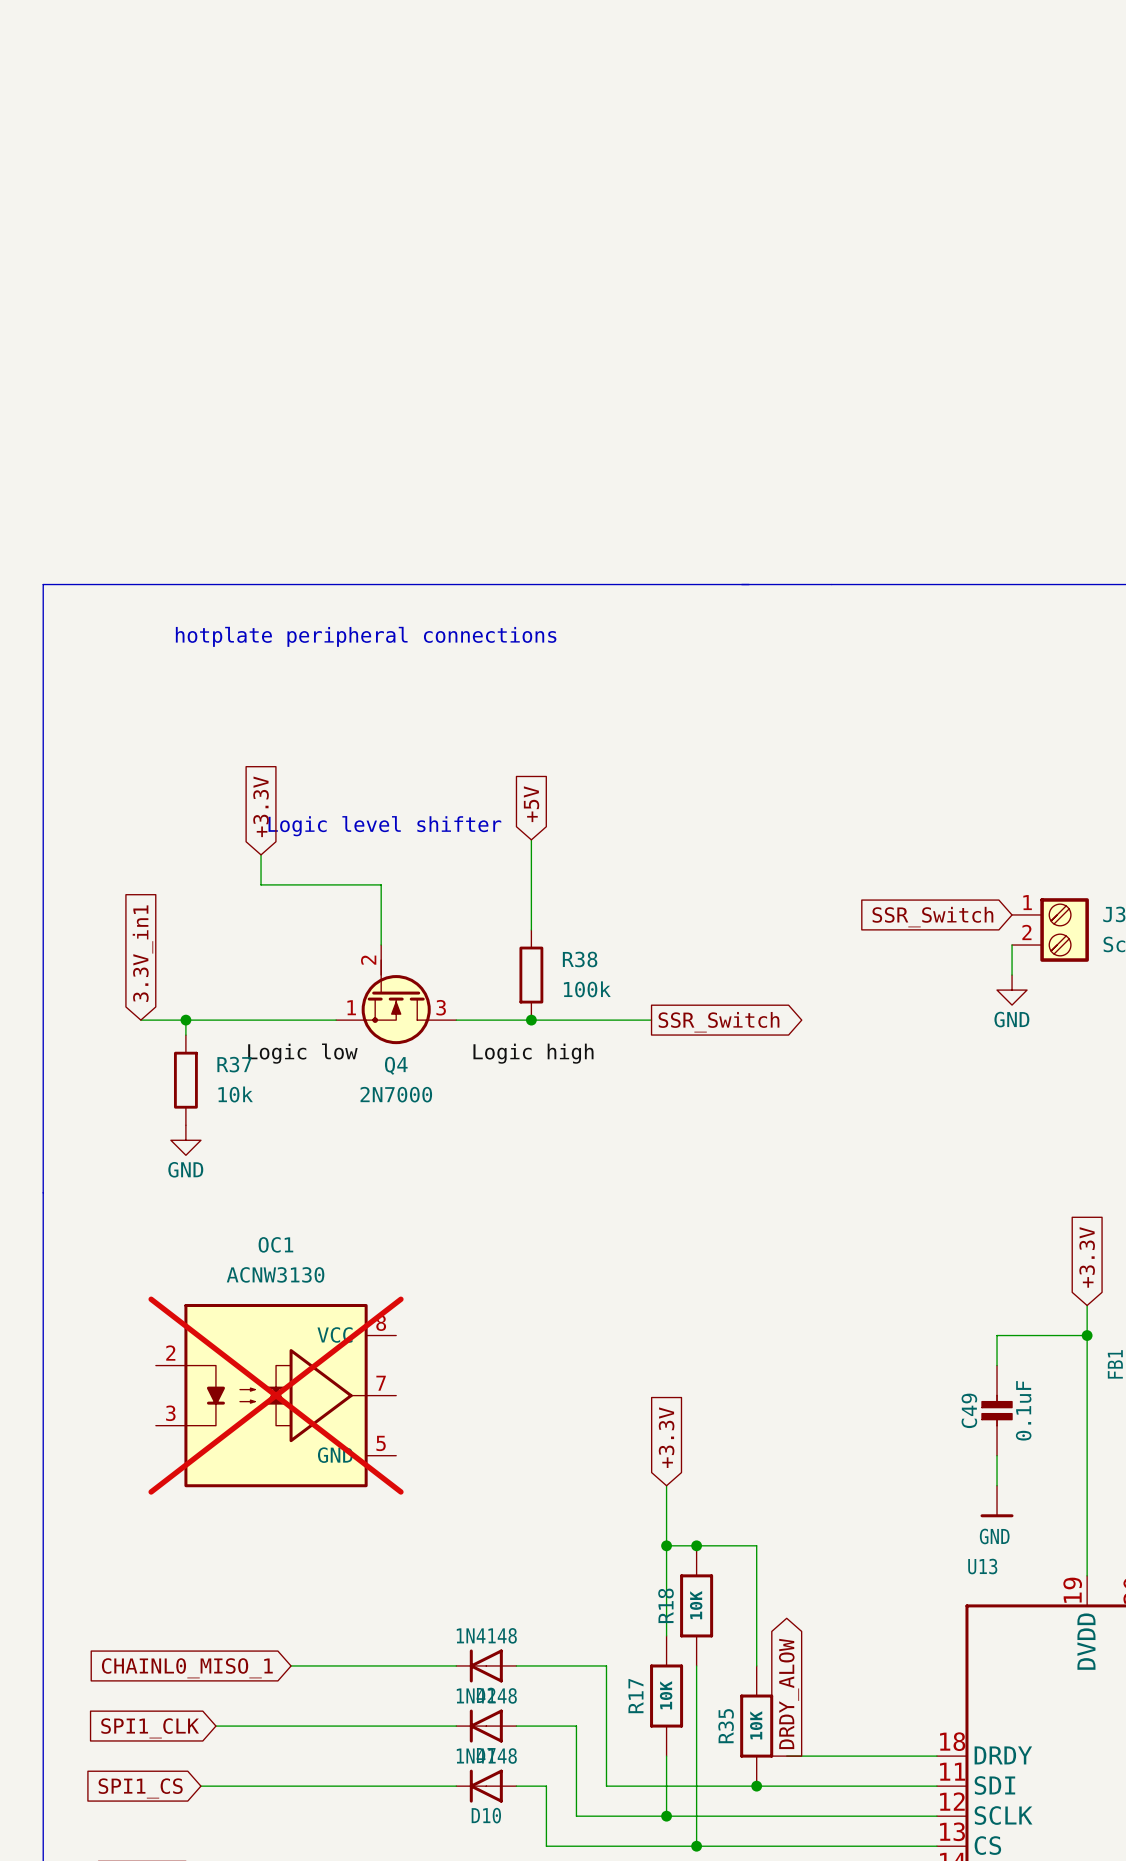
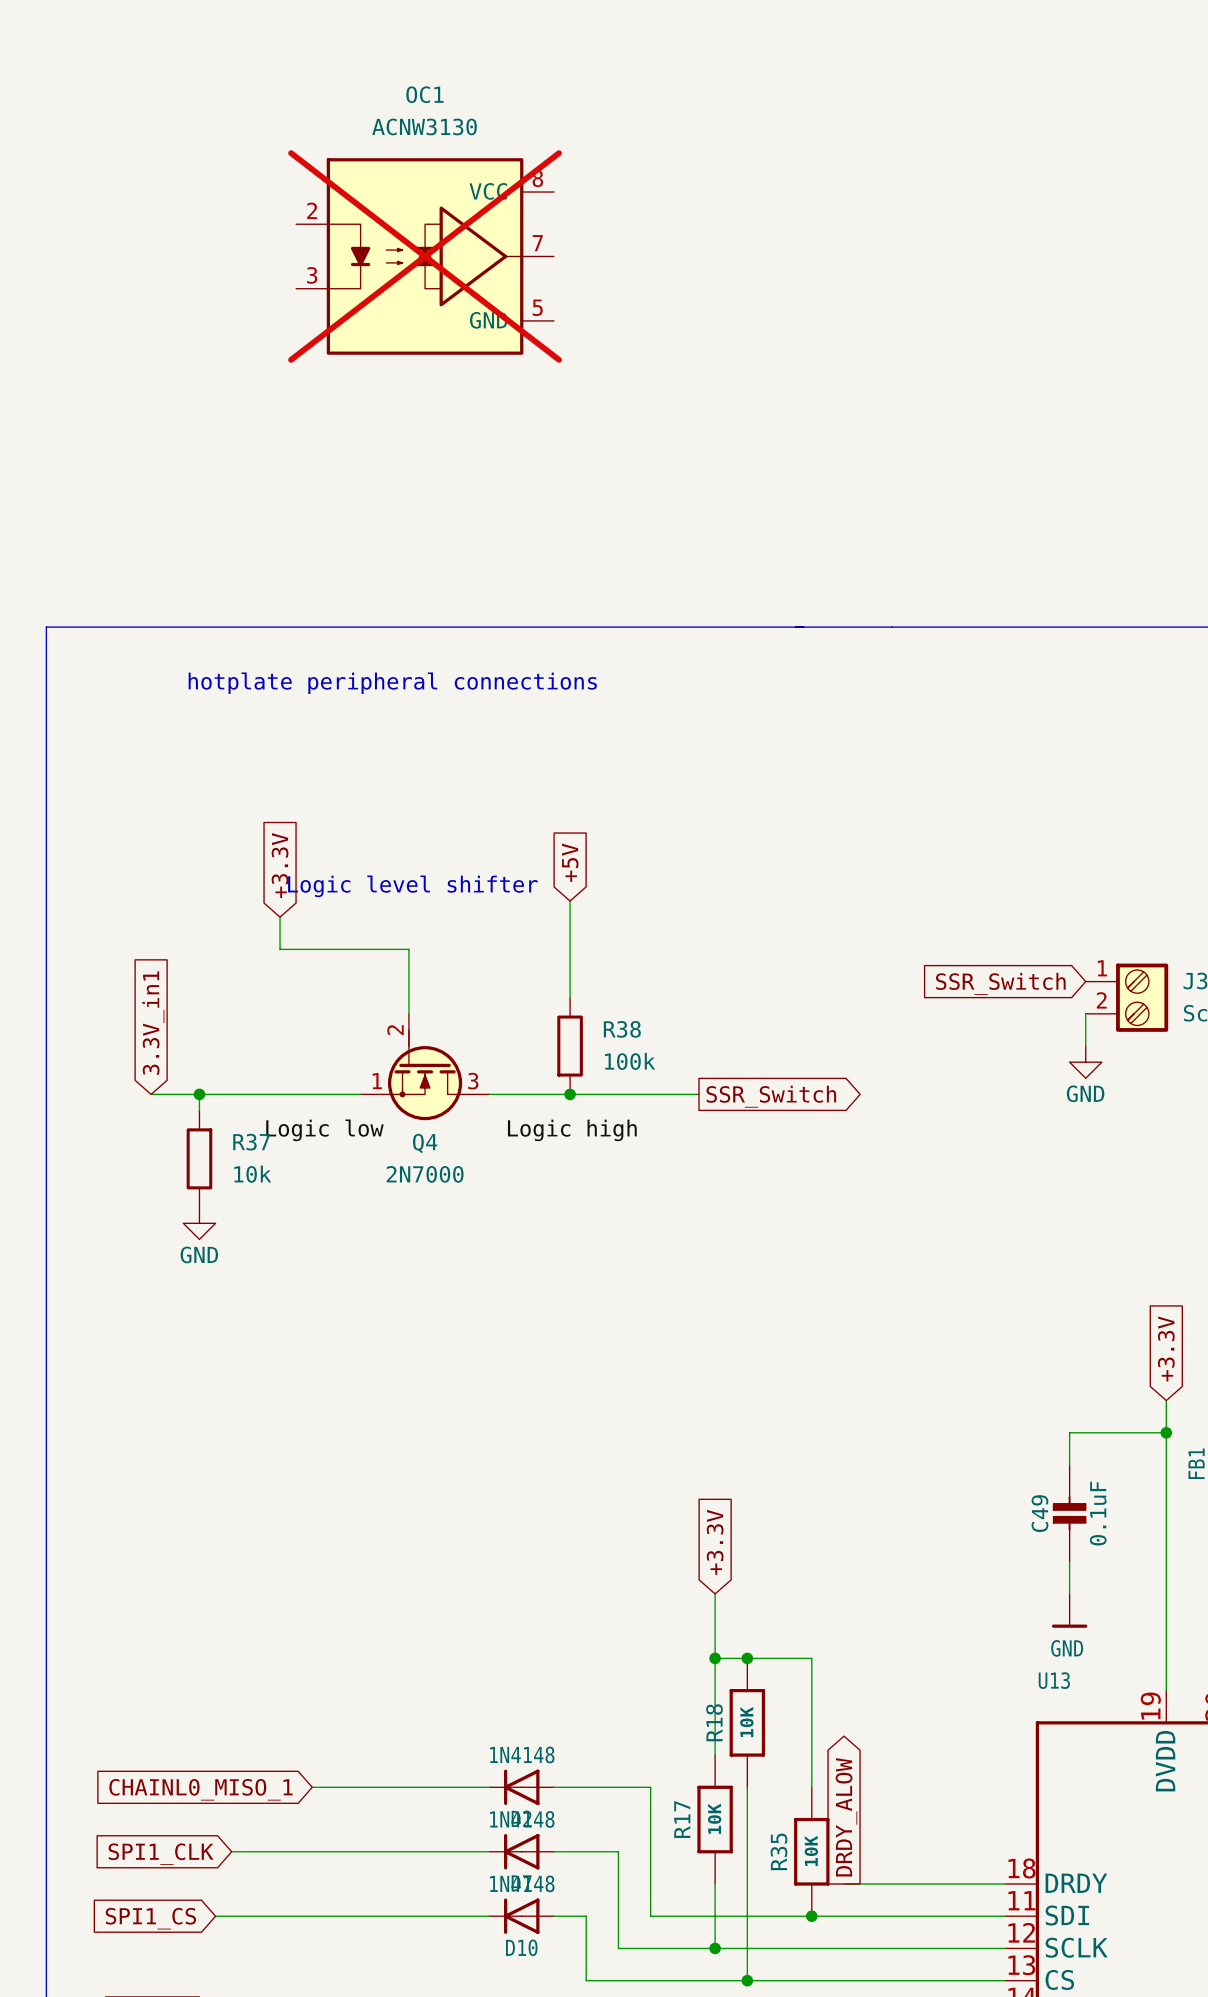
OC1 position: (276, 1395) -> (425, 256)

